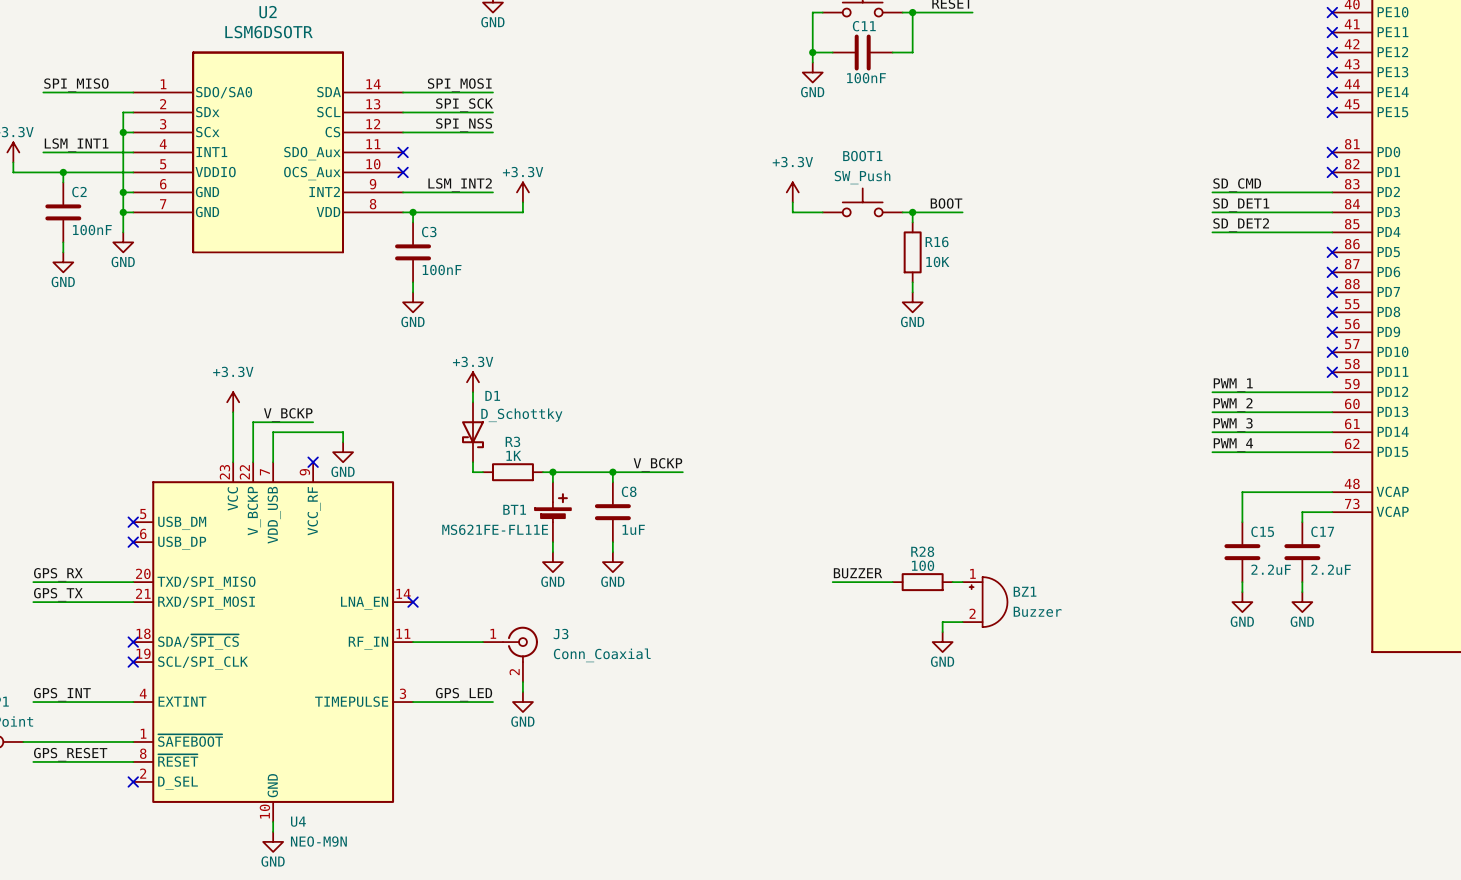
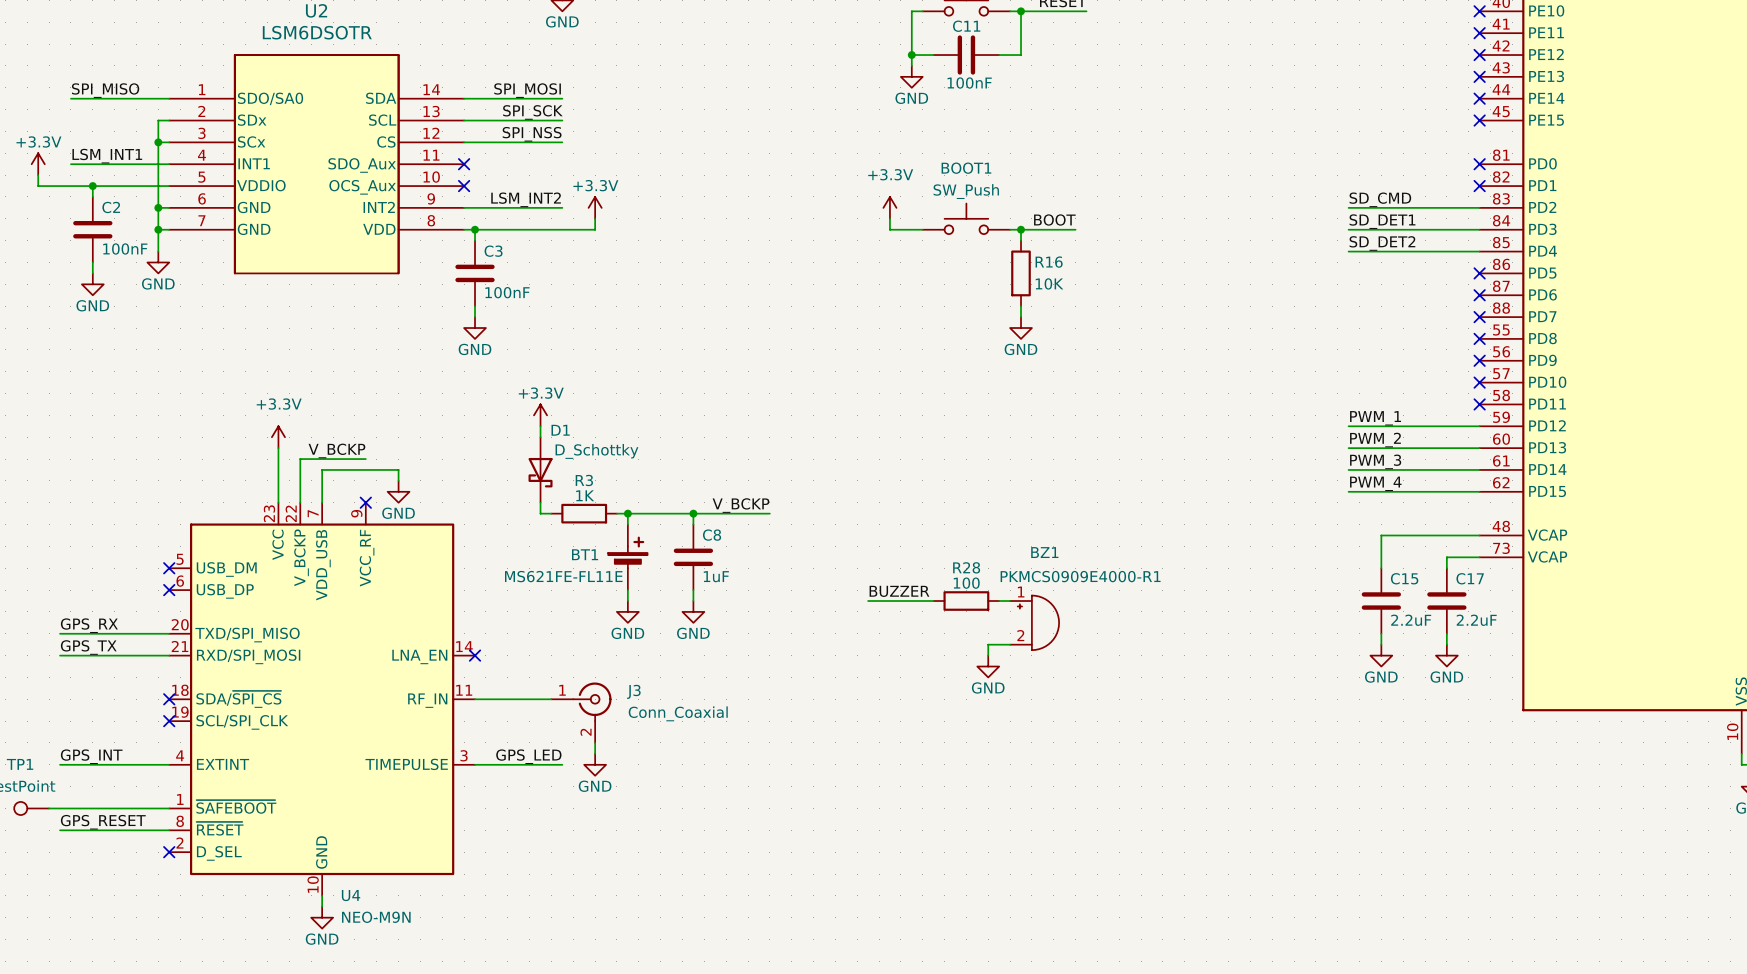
label position: BUZZER (858, 573) -> BUZZER (899, 591)
wire: (832, 582) (892, 582) -> (868, 601) (933, 601)
R28 position: (922, 582) -> (966, 601)
wire: (952, 582) (962, 582) -> (999, 601) (1010, 601)
BZ1 name position: BZ1 (1025, 591) -> BZ1 (1044, 552)
BZ1 position: (985, 602) -> (1034, 622)
BZ1 value: Buzzer (1037, 611) -> PKMCS0909E4000-R1 (1080, 576)
wire: (962, 622) (942, 622) (942, 632) -> (1010, 644) (988, 644) (988, 655)
power symbol position: GND (942, 642) -> GND (988, 666)

